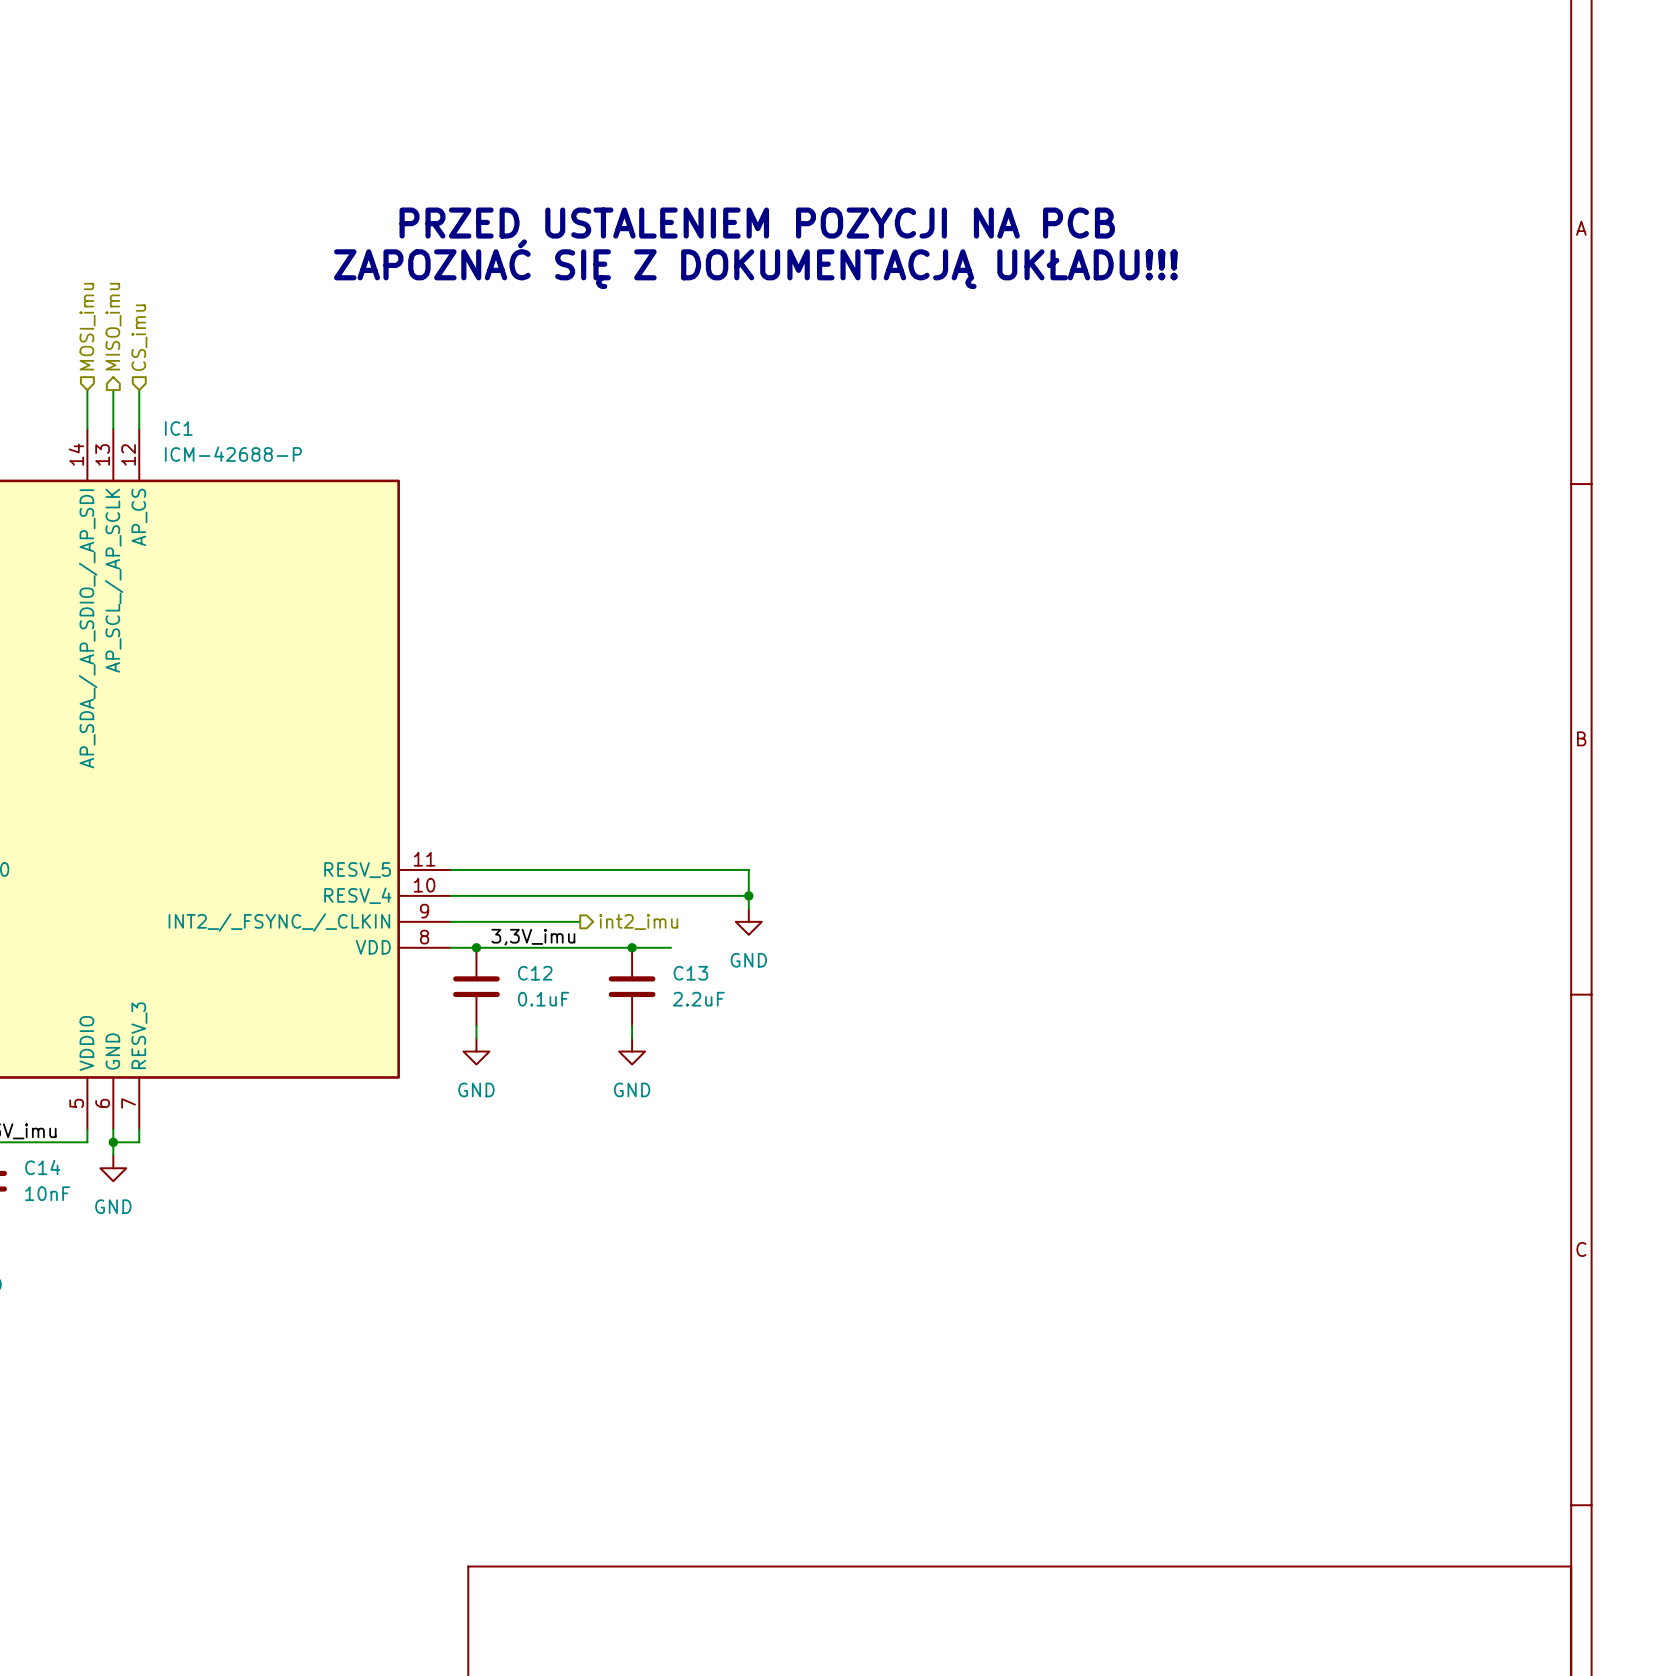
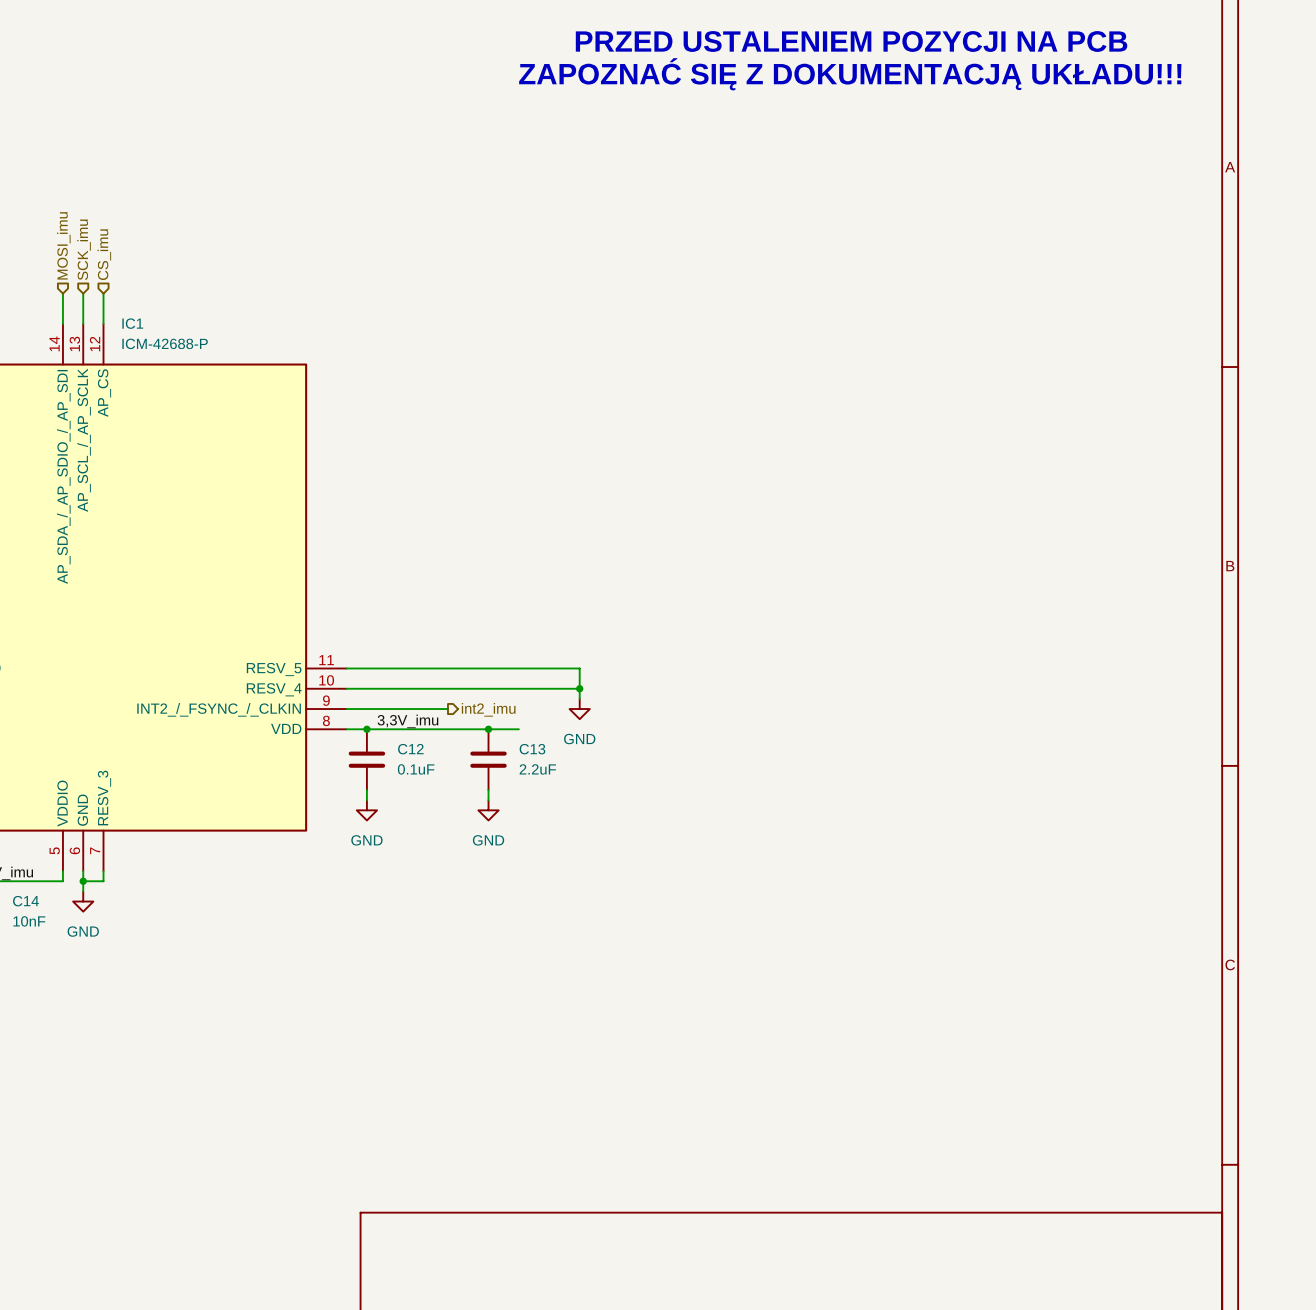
text: none -> PRZED USTALENIEM POZYCJI NA PCB (851, 41)
text: none -> ZAPOZNAĆ SIĘ Z DOKUMENTACJĄ UKŁADU!!! (850, 74)
text: PRZED USTALENIEM POZYCJI NA PCB (757, 223) -> none
text: ZAPOZNAĆ SIĘ Z DOKUMENTACJĄ UKŁADU!!! (755, 264) -> none
hierarchical label shape: output (113, 326) -> input (84, 249)
hierarchical label: MISO_imu (113, 326) -> SCK_imu (84, 249)

